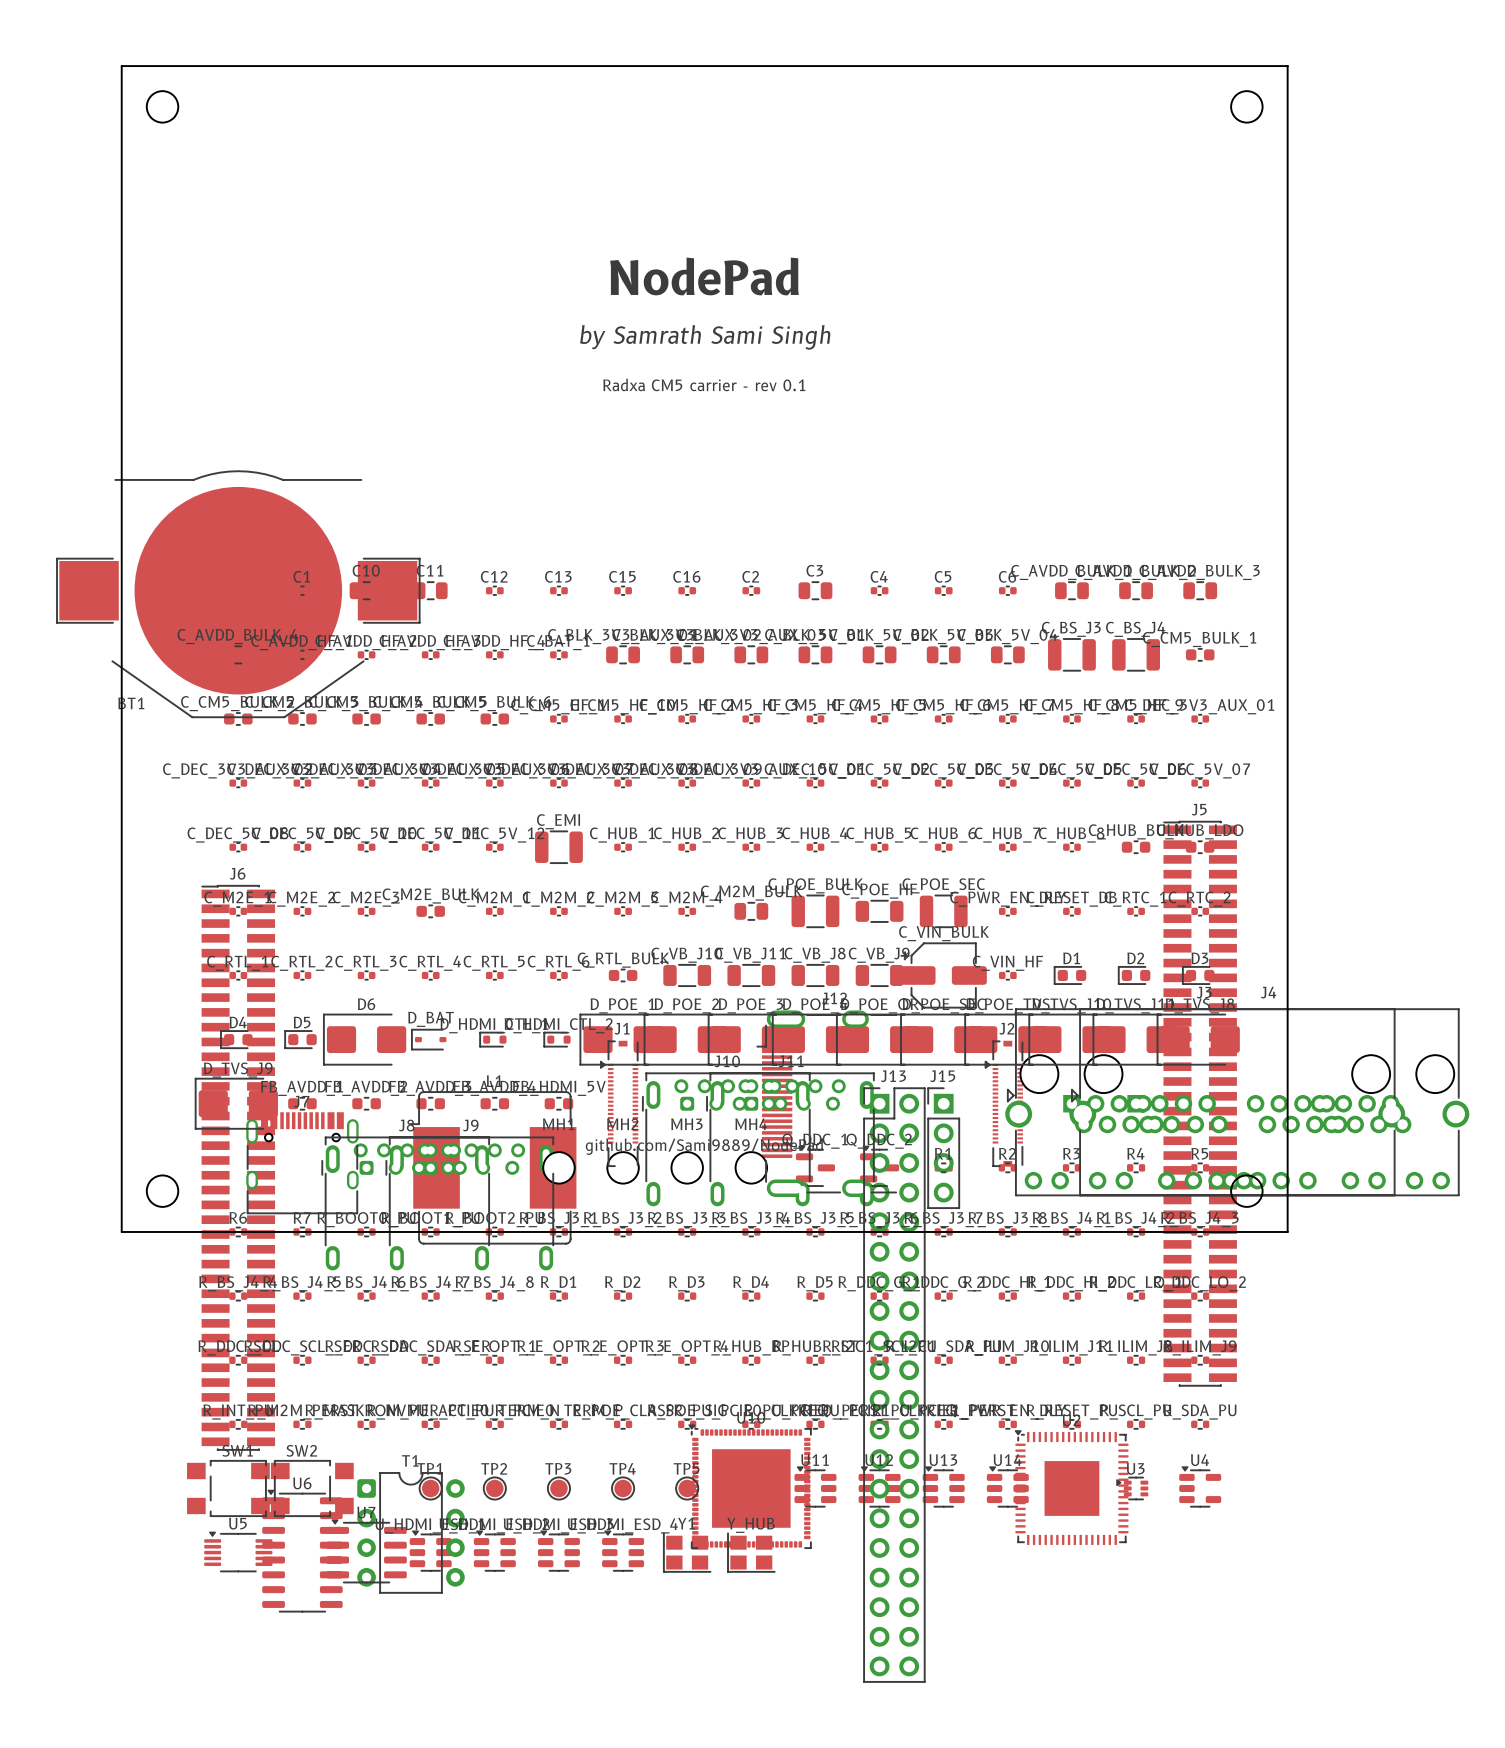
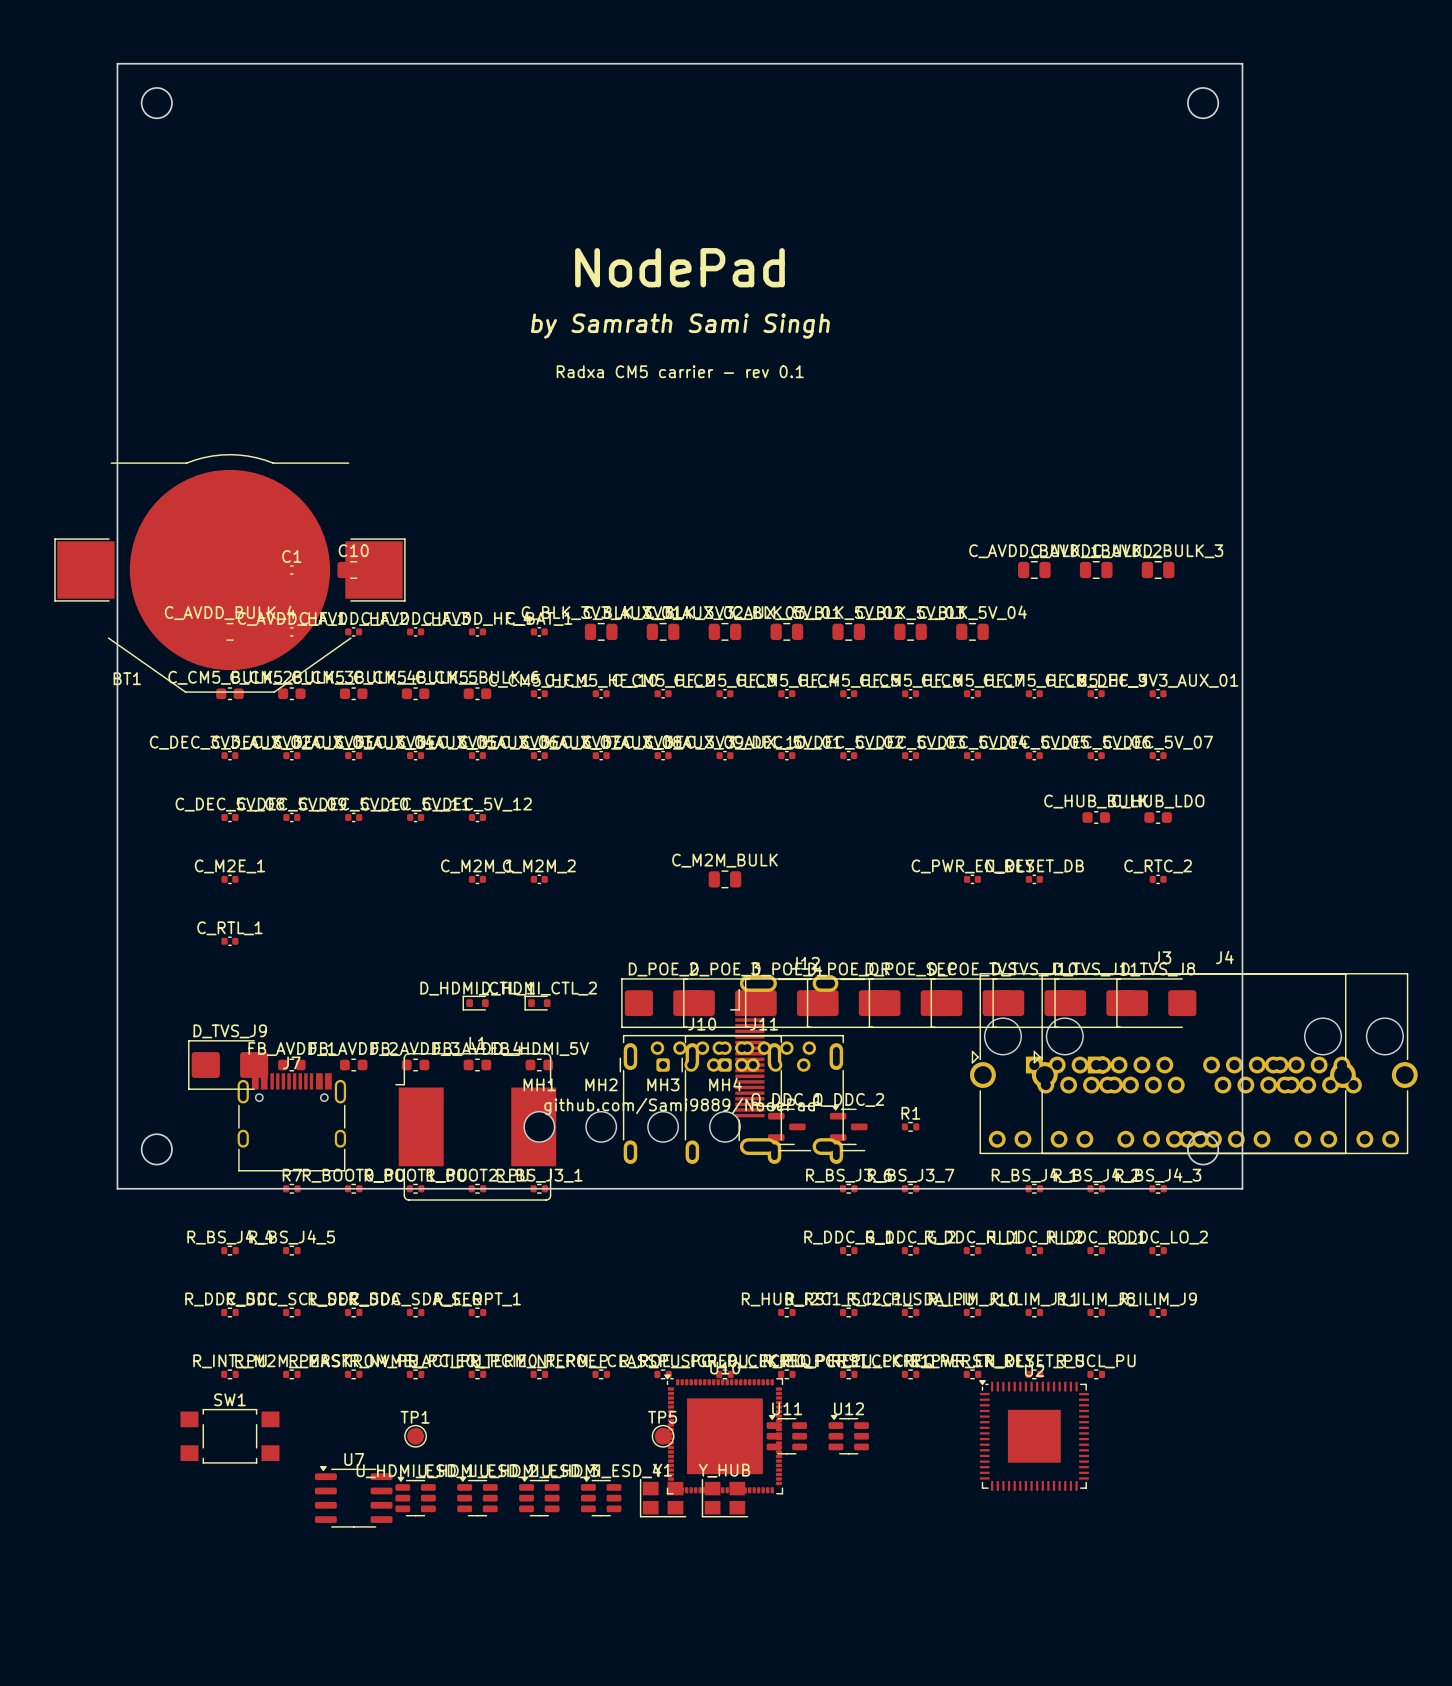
C11: (430, 590) -> none
C12: (494, 590) -> none
C13: (558, 590) -> none
C15: (623, 590) -> none
C16: (687, 590) -> none
C2: (751, 590) -> none
C3: (815, 590) -> none
C4: (879, 590) -> none
C5: (943, 590) -> none
C6: (1007, 590) -> none
C_BS_J3: (1071, 654) -> none
C_BS_J4: (1136, 654) -> none
C_CM5_BULK_1: (1200, 654) -> none
C_EMI: (558, 847) -> none
C_HUB_1: (623, 847) -> none
C_HUB_2: (687, 847) -> none
C_HUB_3: (751, 847) -> none
C_HUB_4: (815, 847) -> none
C_HUB_5: (879, 847) -> none
C_HUB_6: (943, 847) -> none
C_HUB_7: (1007, 847) -> none
C_HUB_8: (1071, 847) -> none
C_M2E_2: (302, 911) -> none
C_M2E_3: (366, 911) -> none
C_M2E_BULK: (430, 911) -> none
C_M2M_3: (623, 911) -> none
C_M2M_4: (687, 911) -> none
C_POE_BULK: (815, 911) -> none
C_POE_HF: (879, 911) -> none
C_POE_SEC: (943, 911) -> none
C_RTC_1: (1136, 911) -> none
C_RTL_2: (302, 975) -> none
C_RTL_3: (366, 975) -> none
C_RTL_4: (430, 975) -> none
C_RTL_5: (494, 975) -> none
C_RTL_6: (558, 975) -> none
C_RTL_BULK: (623, 975) -> none
C_VB_J10: (687, 975) -> none
C_VB_J11: (751, 975) -> none
C_VB_J8: (815, 975) -> none
C_VB_J9: (879, 975) -> none
C_VIN_BULK: (943, 975) -> none
C_VIN_HF: (1007, 975) -> none
D1: (1070, 975) -> none
D2: (1134, 975) -> none
D3: (1198, 975) -> none
D4: (236, 1039) -> none
D5: (300, 1039) -> none
D6: (364, 1039) -> none
D_BAT: (428, 1039) -> none
D_POE_1: (621, 1039) -> none
J1: (619, 1103) -> none
J2: (1004, 1103) -> none
J5: (1200, 1103) -> none
J15: (943, 1148) -> none
J6: (238, 1167) -> none
R2: (1007, 1167) -> none
R3: (1071, 1167) -> none
R4: (1136, 1167) -> none
R5: (1200, 1167) -> none
J8: (405, 1203) -> none
J9: (469, 1203) -> none
R6: (238, 1231) -> none
R_BS_J3_2: (623, 1231) -> none
R_BS_J3_3: (687, 1231) -> none
R_BS_J3_4: (751, 1231) -> none
R_BS_J3_5: (815, 1231) -> none
R_BS_J3_8: (1007, 1231) -> none
R_BS_J4_6: (366, 1296) -> none
R_BS_J4_7: (430, 1296) -> none
R_BS_J4_8: (494, 1296) -> none
R_D1: (558, 1296) -> none
R_D2: (623, 1296) -> none
R_D3: (687, 1296) -> none
R_D4: (751, 1296) -> none
R_D5: (815, 1296) -> none
R_E_OPT_2: (558, 1360) -> none
R_E_OPT_3: (623, 1360) -> none
R_E_OPT_4: (687, 1360) -> none
R_HUB_BP: (751, 1360) -> none
J13: (894, 1385) -> none
R_SDA_PU: (1200, 1424) -> none
U13: (943, 1486) -> none
U14: (1007, 1486) -> none
U4: (1200, 1486) -> none
SW2: (302, 1488) -> none
TP2: (494, 1488) -> none
TP3: (558, 1488) -> none
TP4: (623, 1488) -> none
U3: (1132, 1488) -> none
T1: (410, 1532) -> none
U5: (238, 1551) -> none
U6: (302, 1551) -> none

